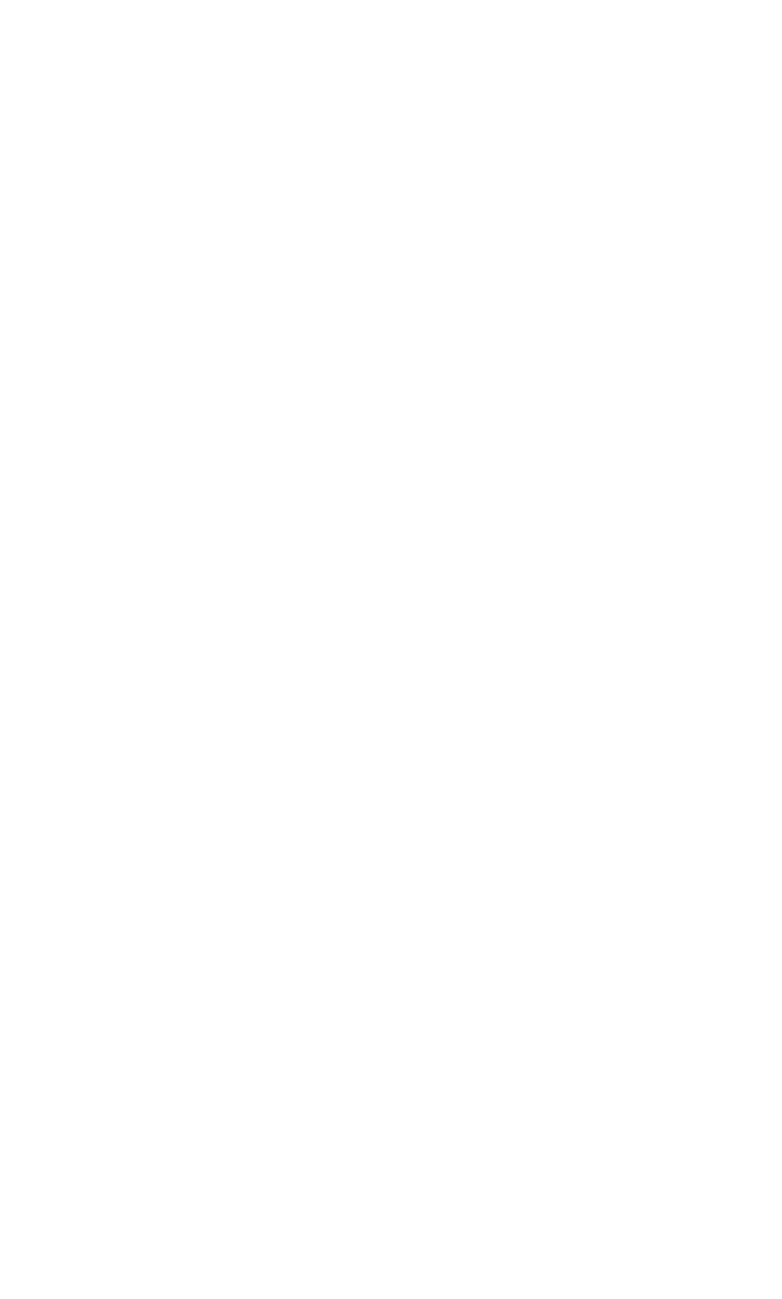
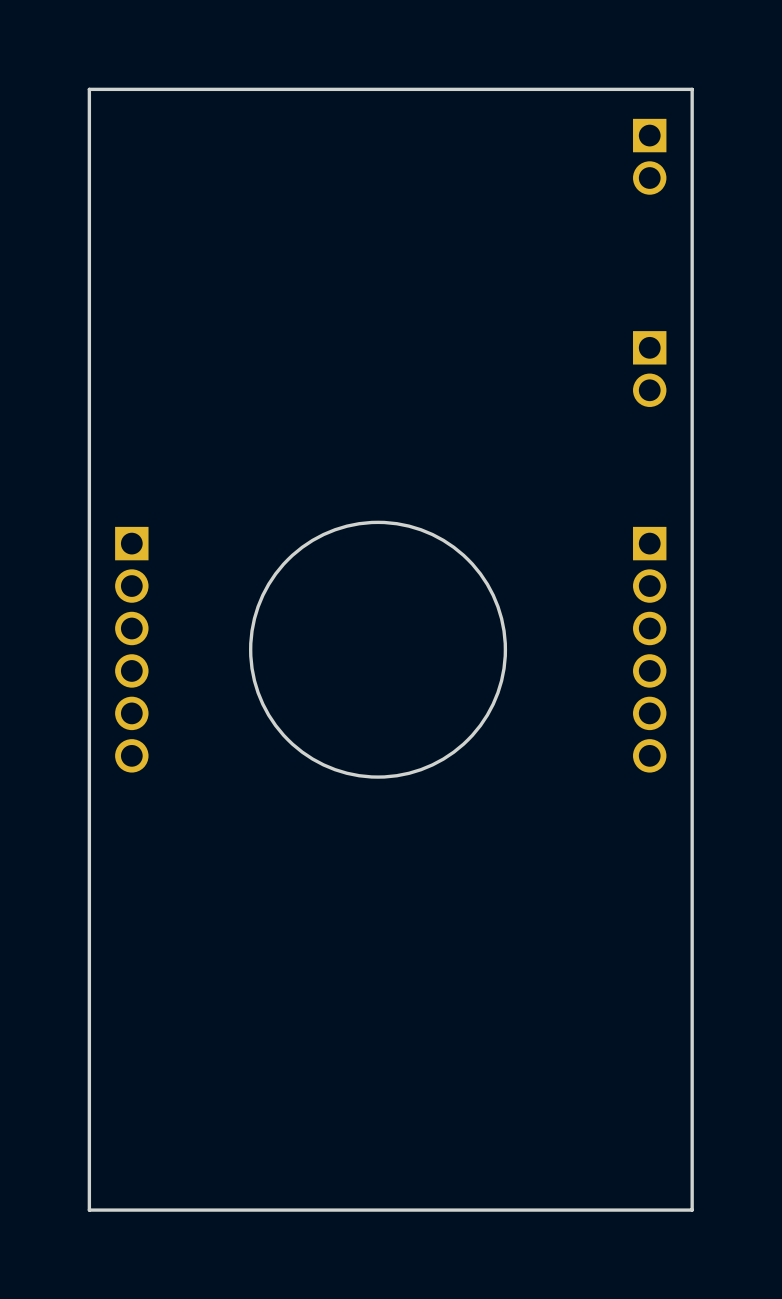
board edge: none -> (692, 89) (89, 89) (89, 1210) (692, 1210) (692, 89)
part: none -> (649, 156)
part: none -> (649, 369)
round board edge: none -> [249, 520, 508, 779]
part: none -> (131, 649)
part: none -> (649, 649)

